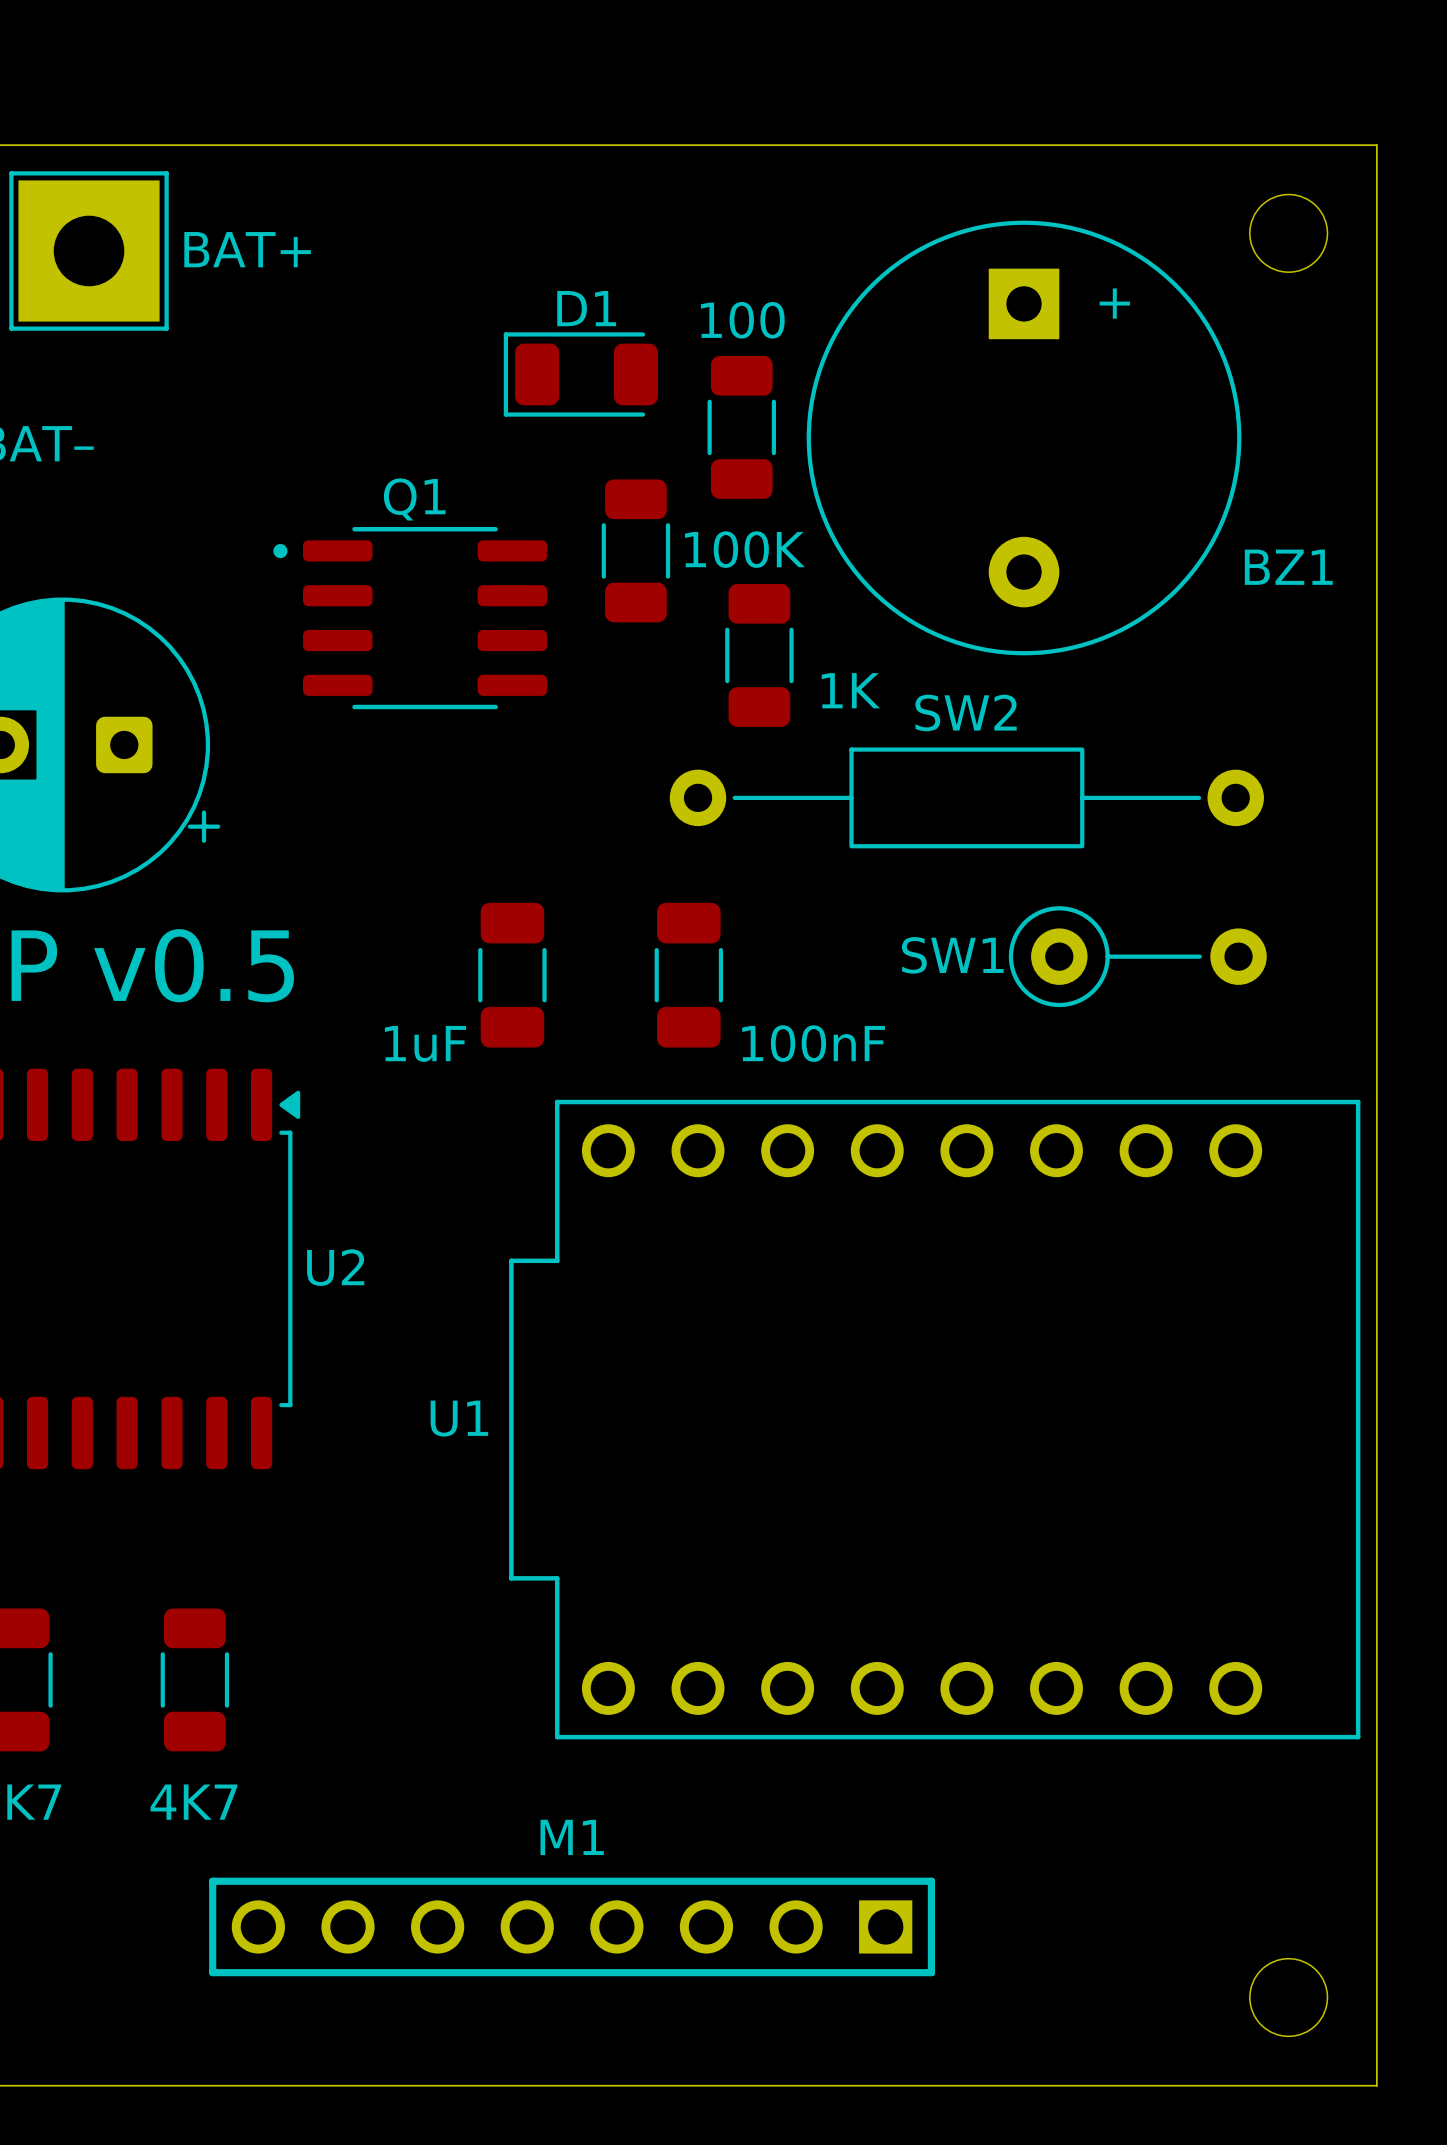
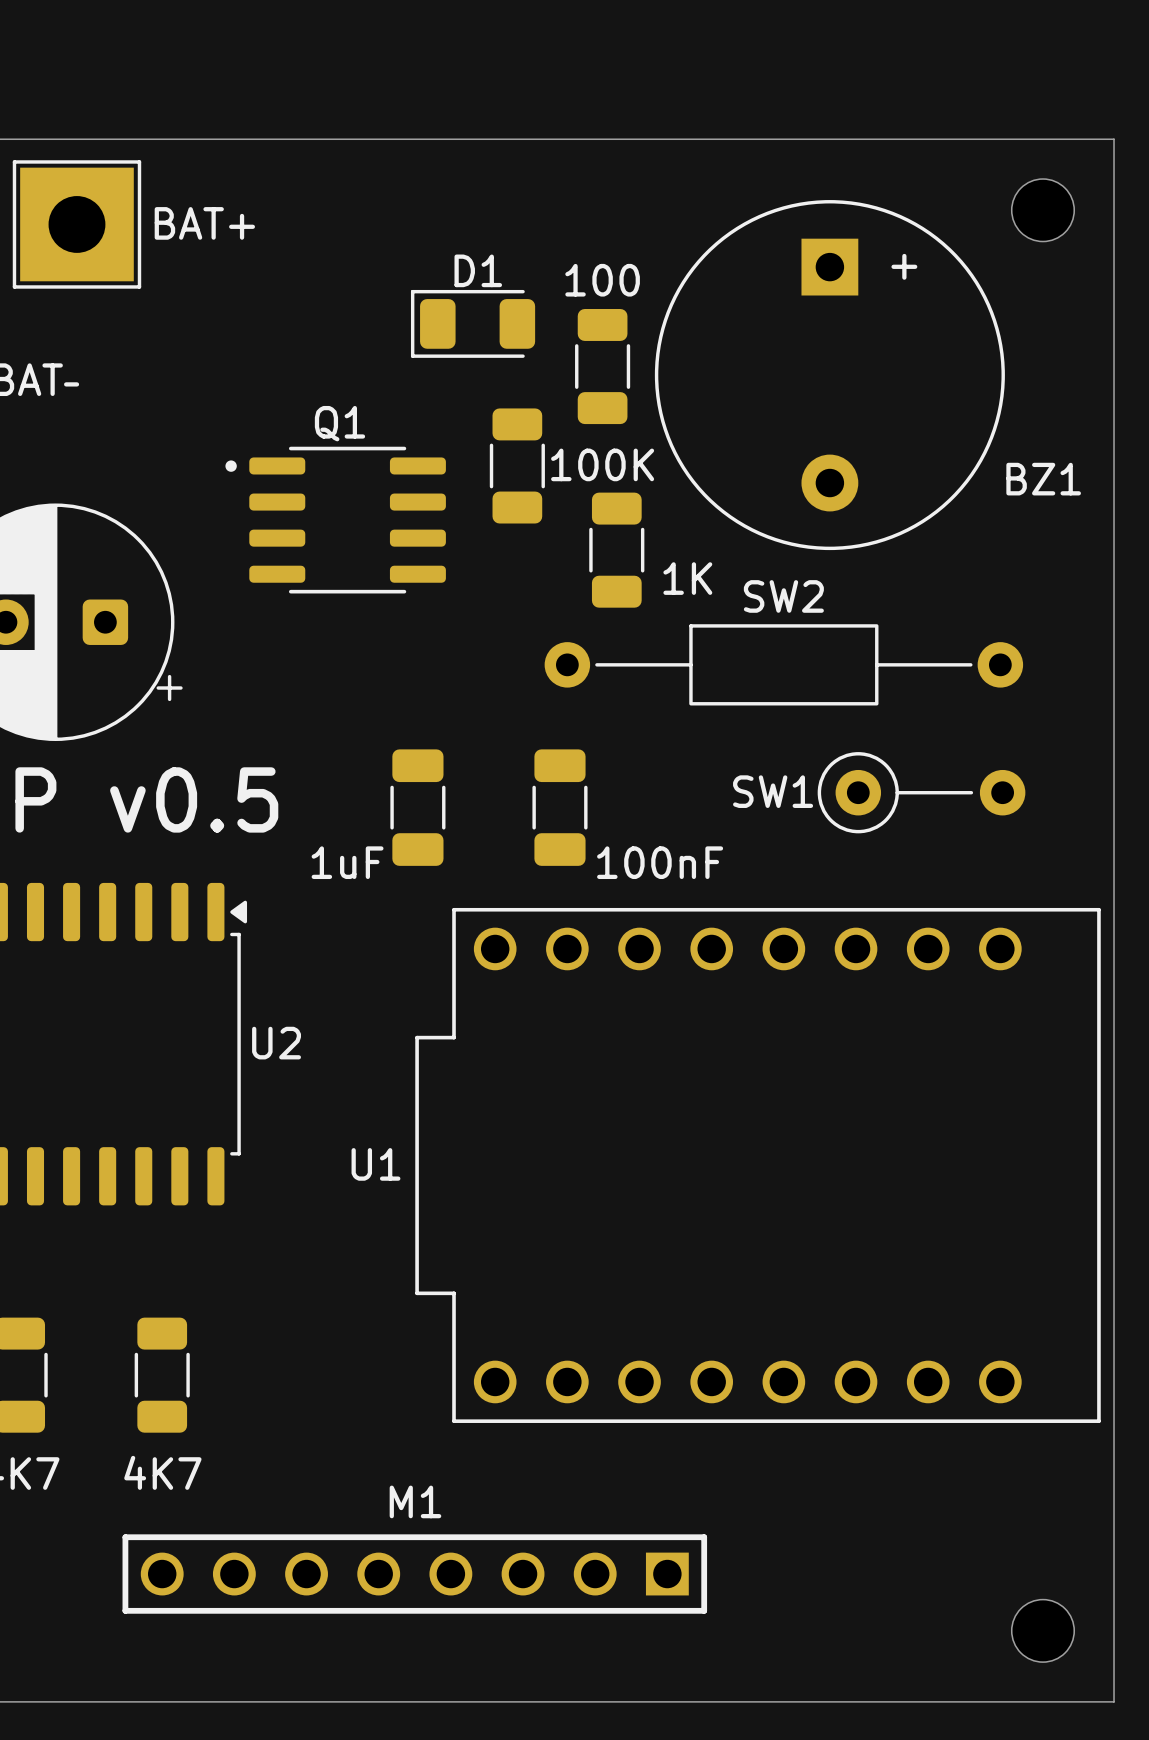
M1 position: (572, 1926) -> (414, 1574)

